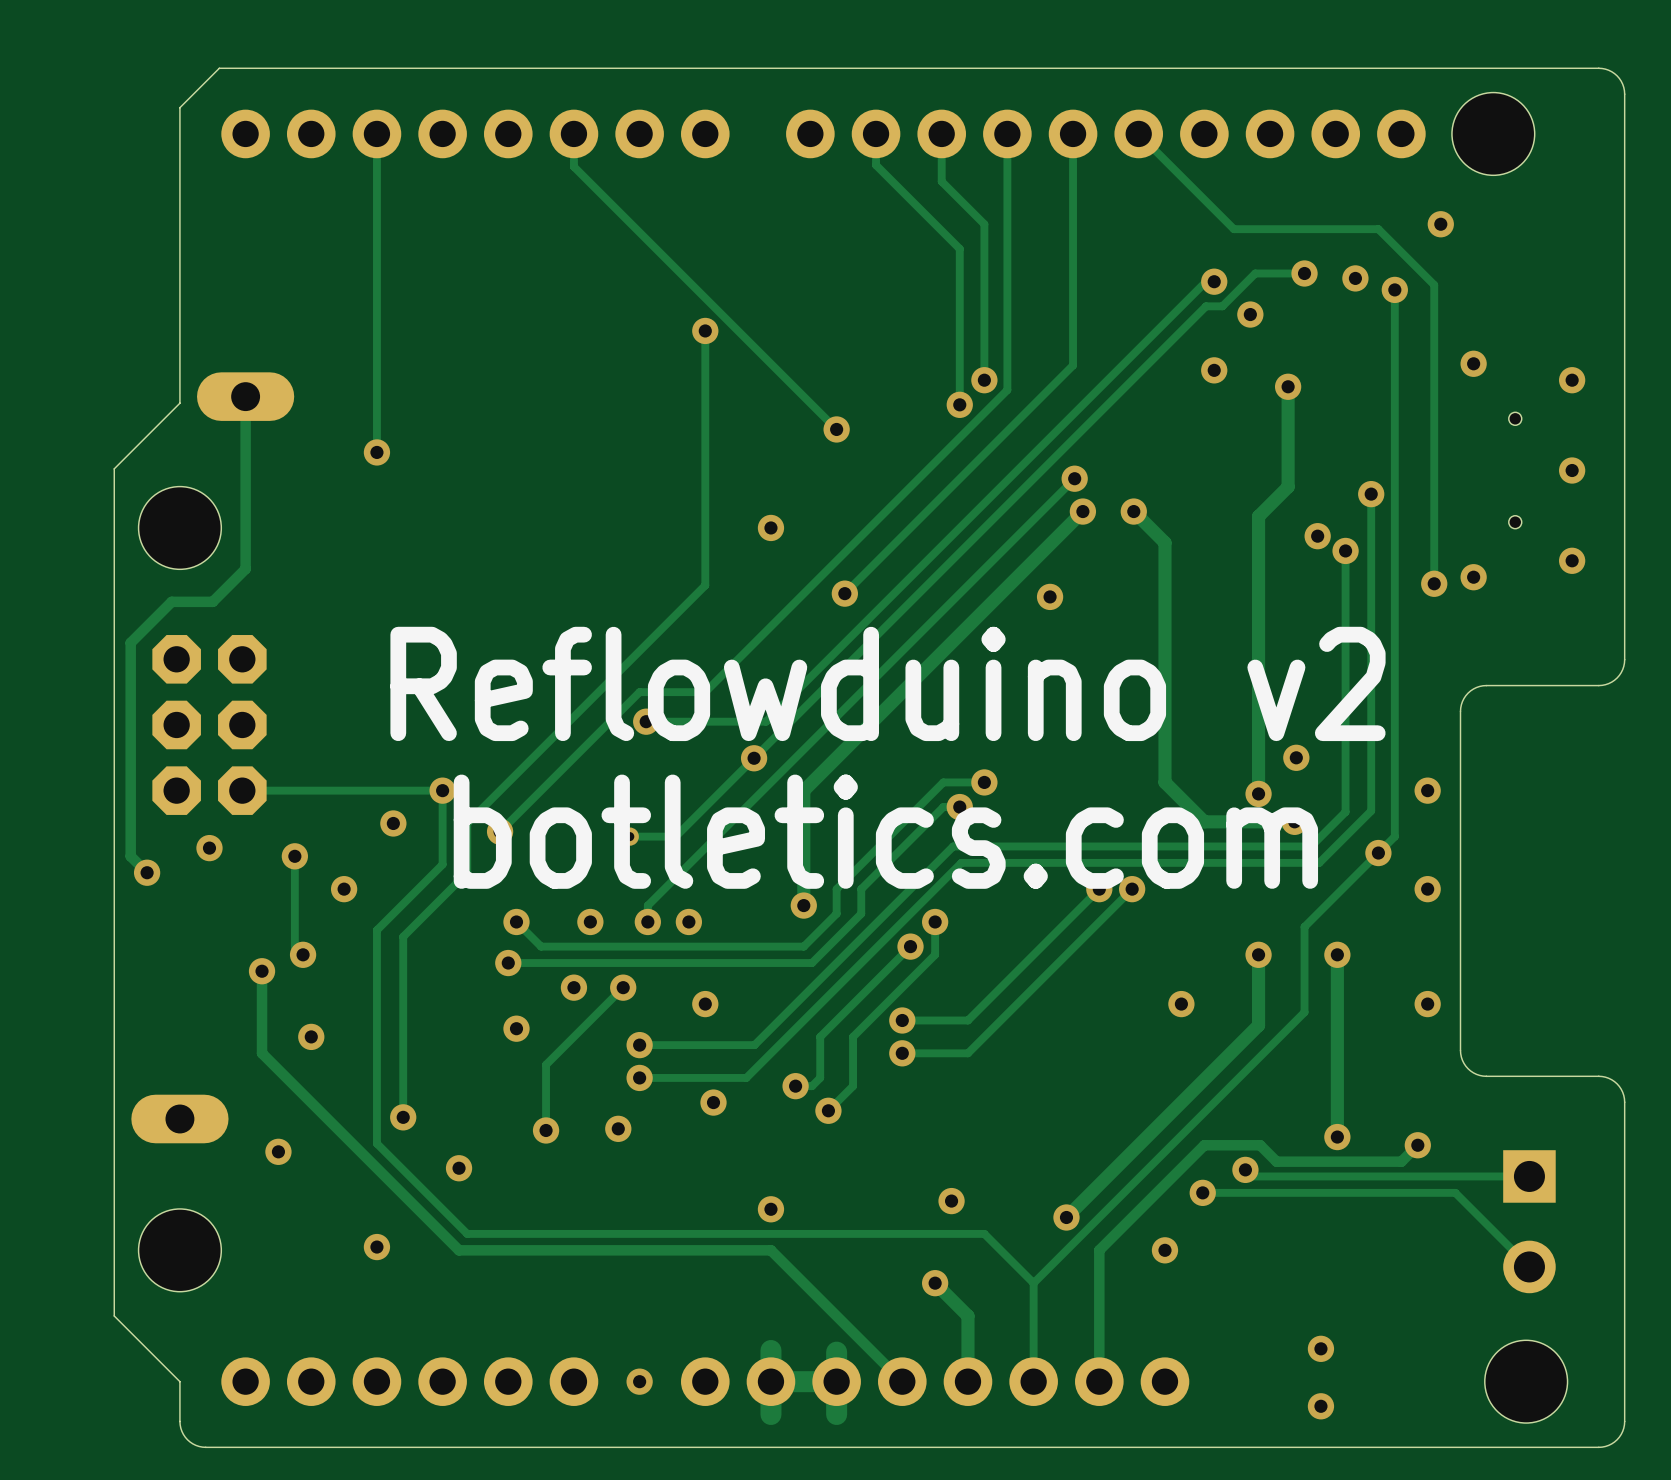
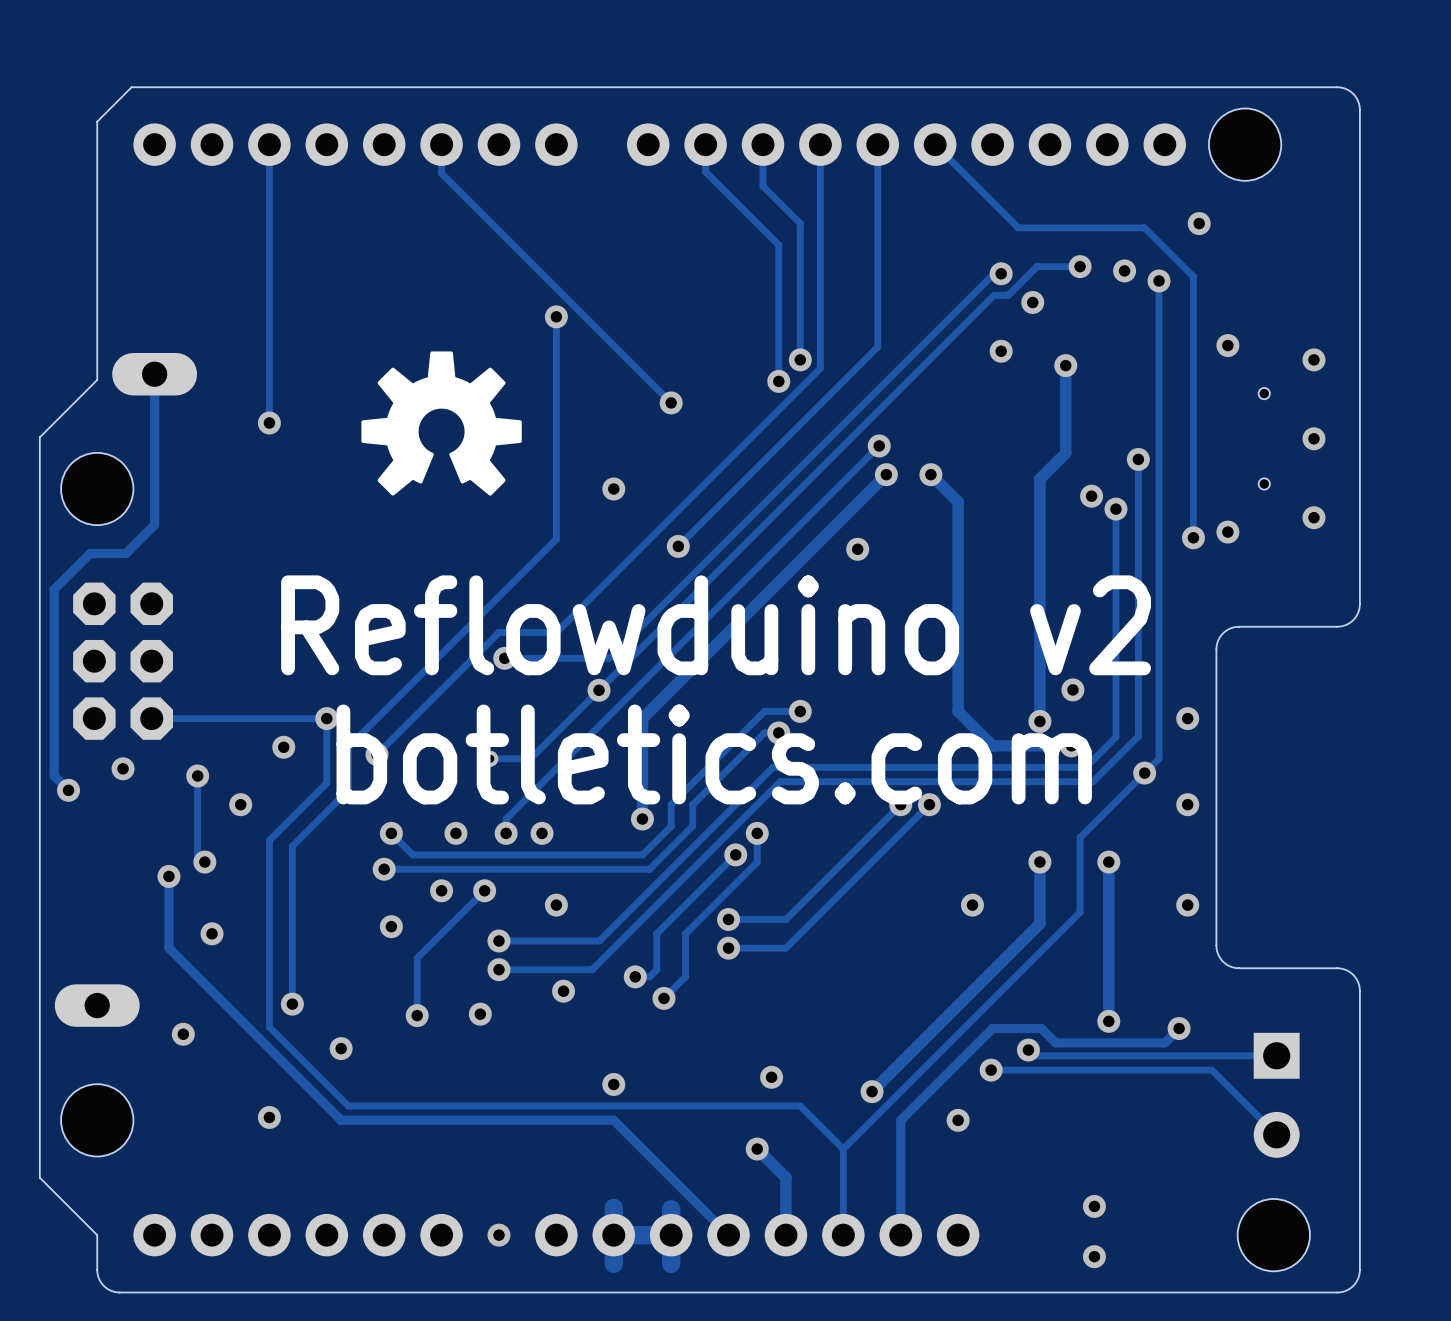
drawing: none -> [361, 351, 522, 496]

